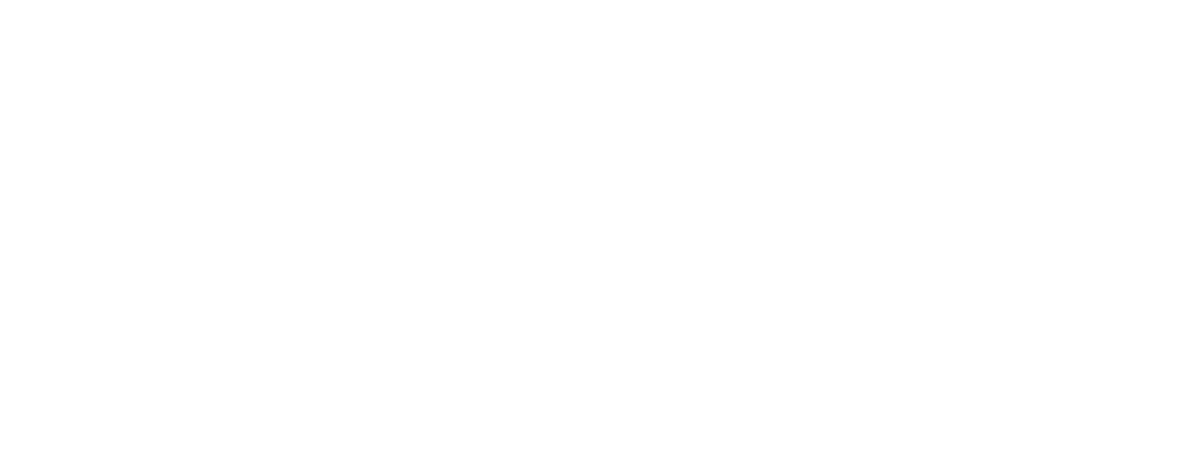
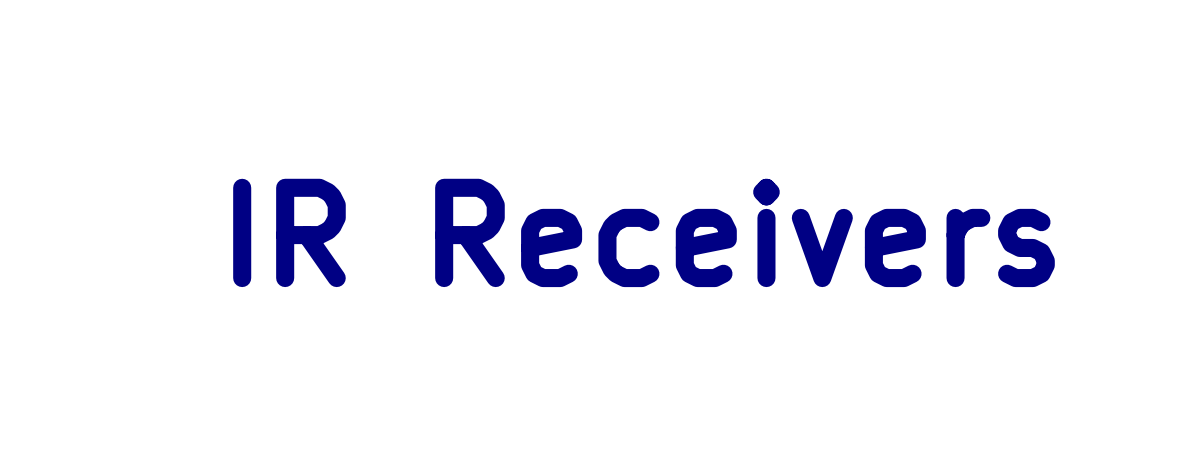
text: none -> IR Receivers (643, 232)

